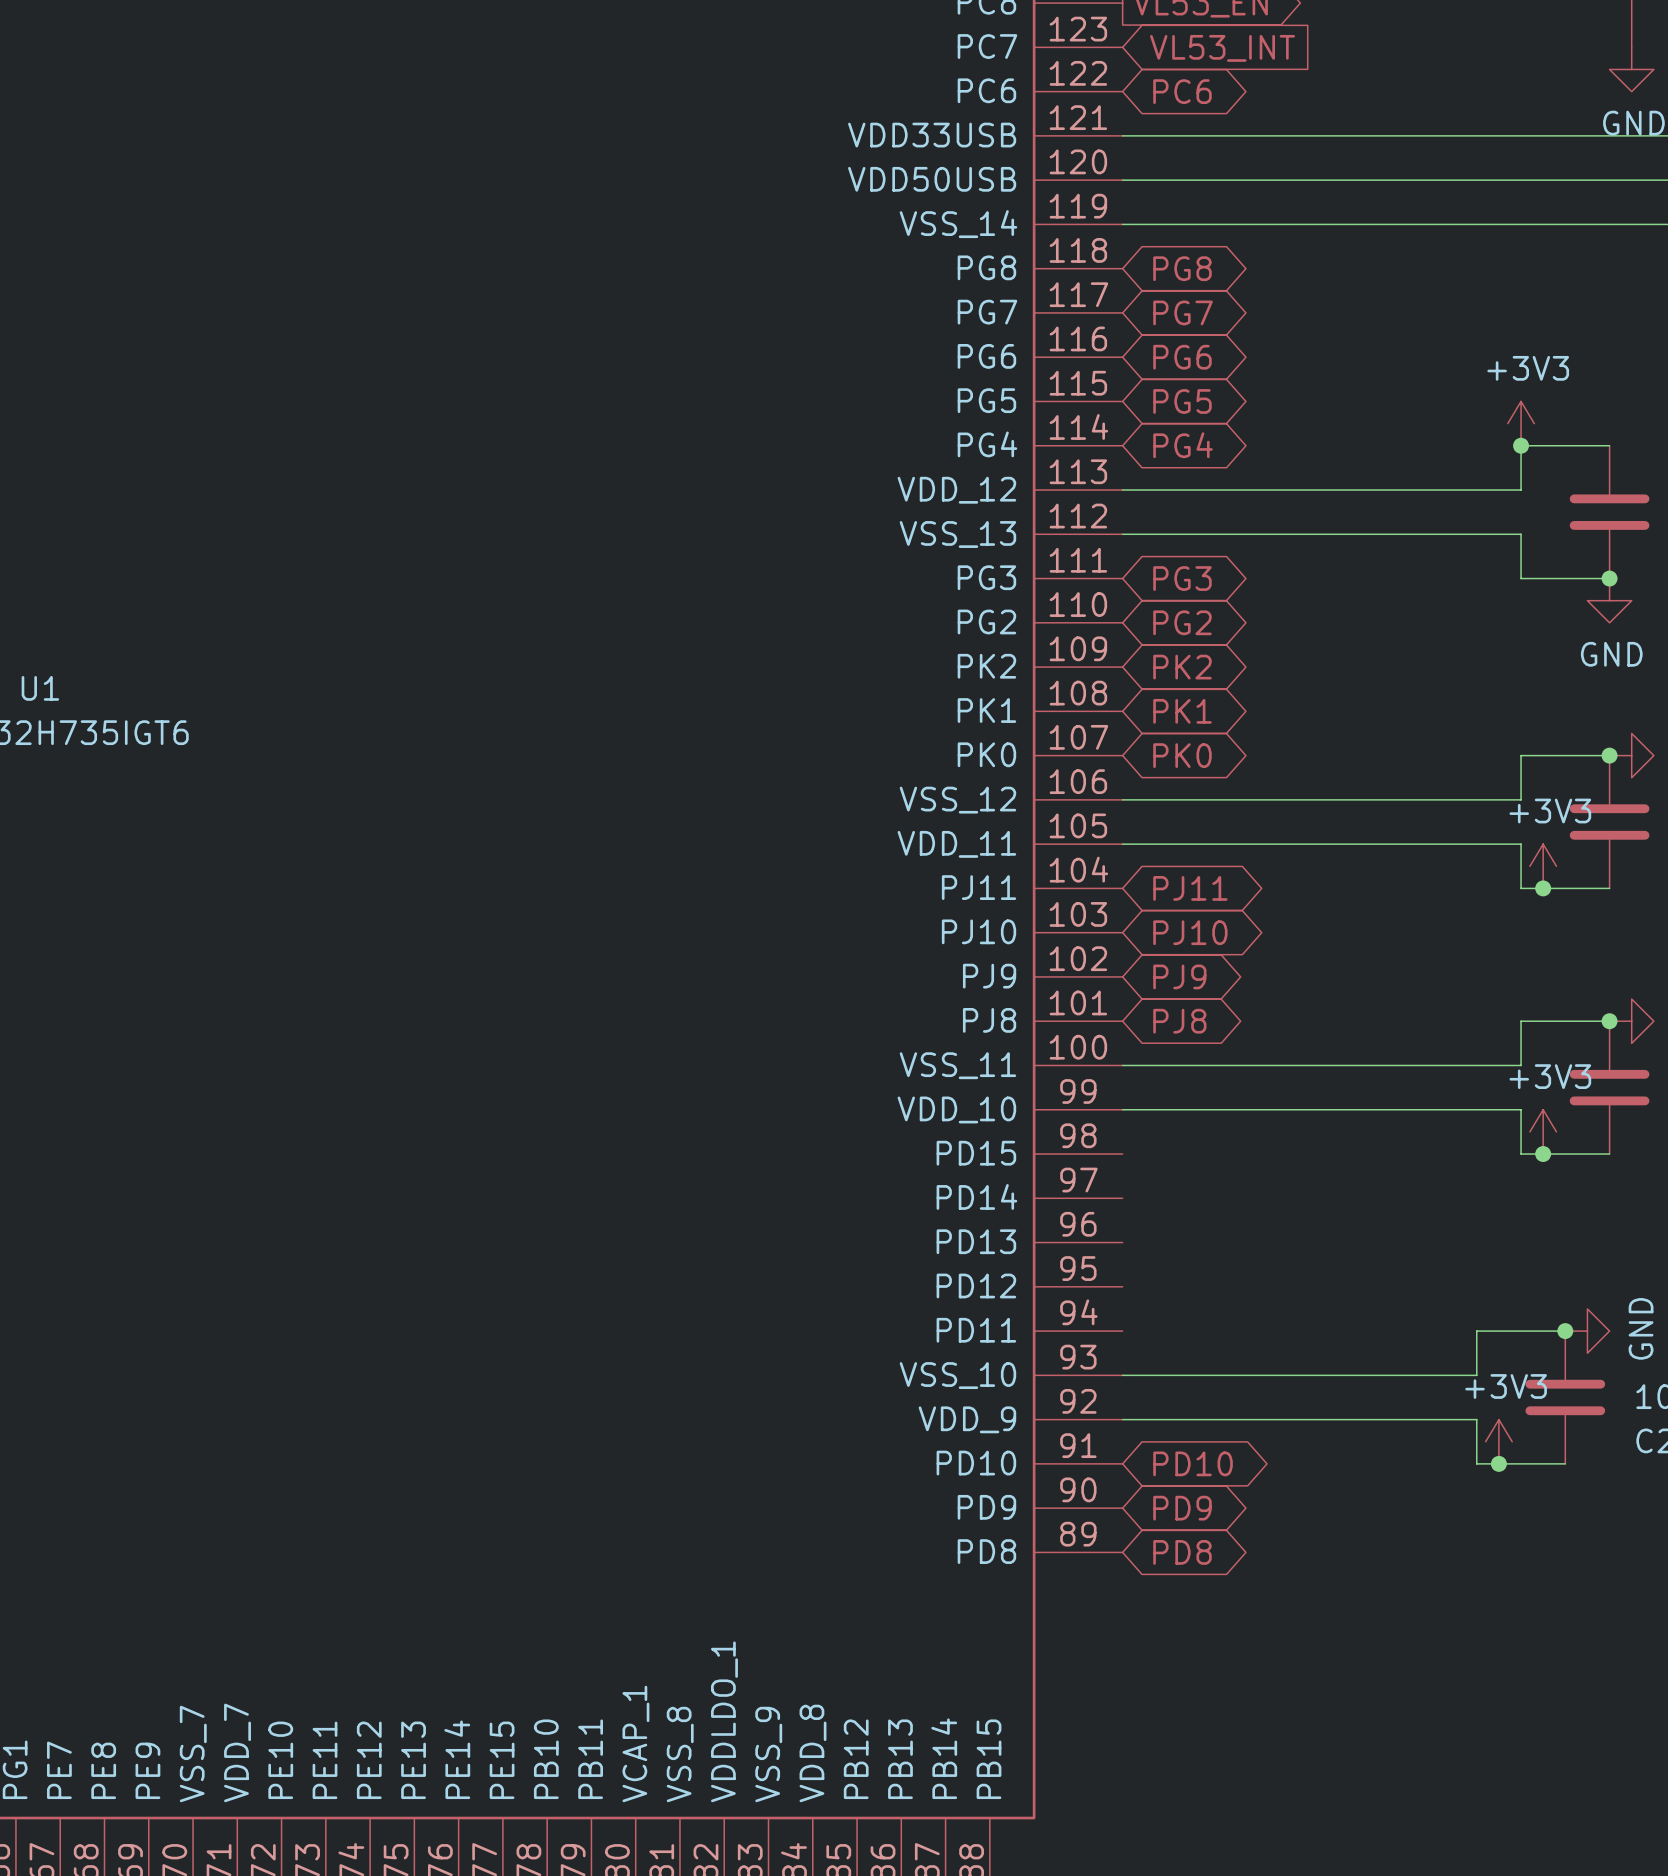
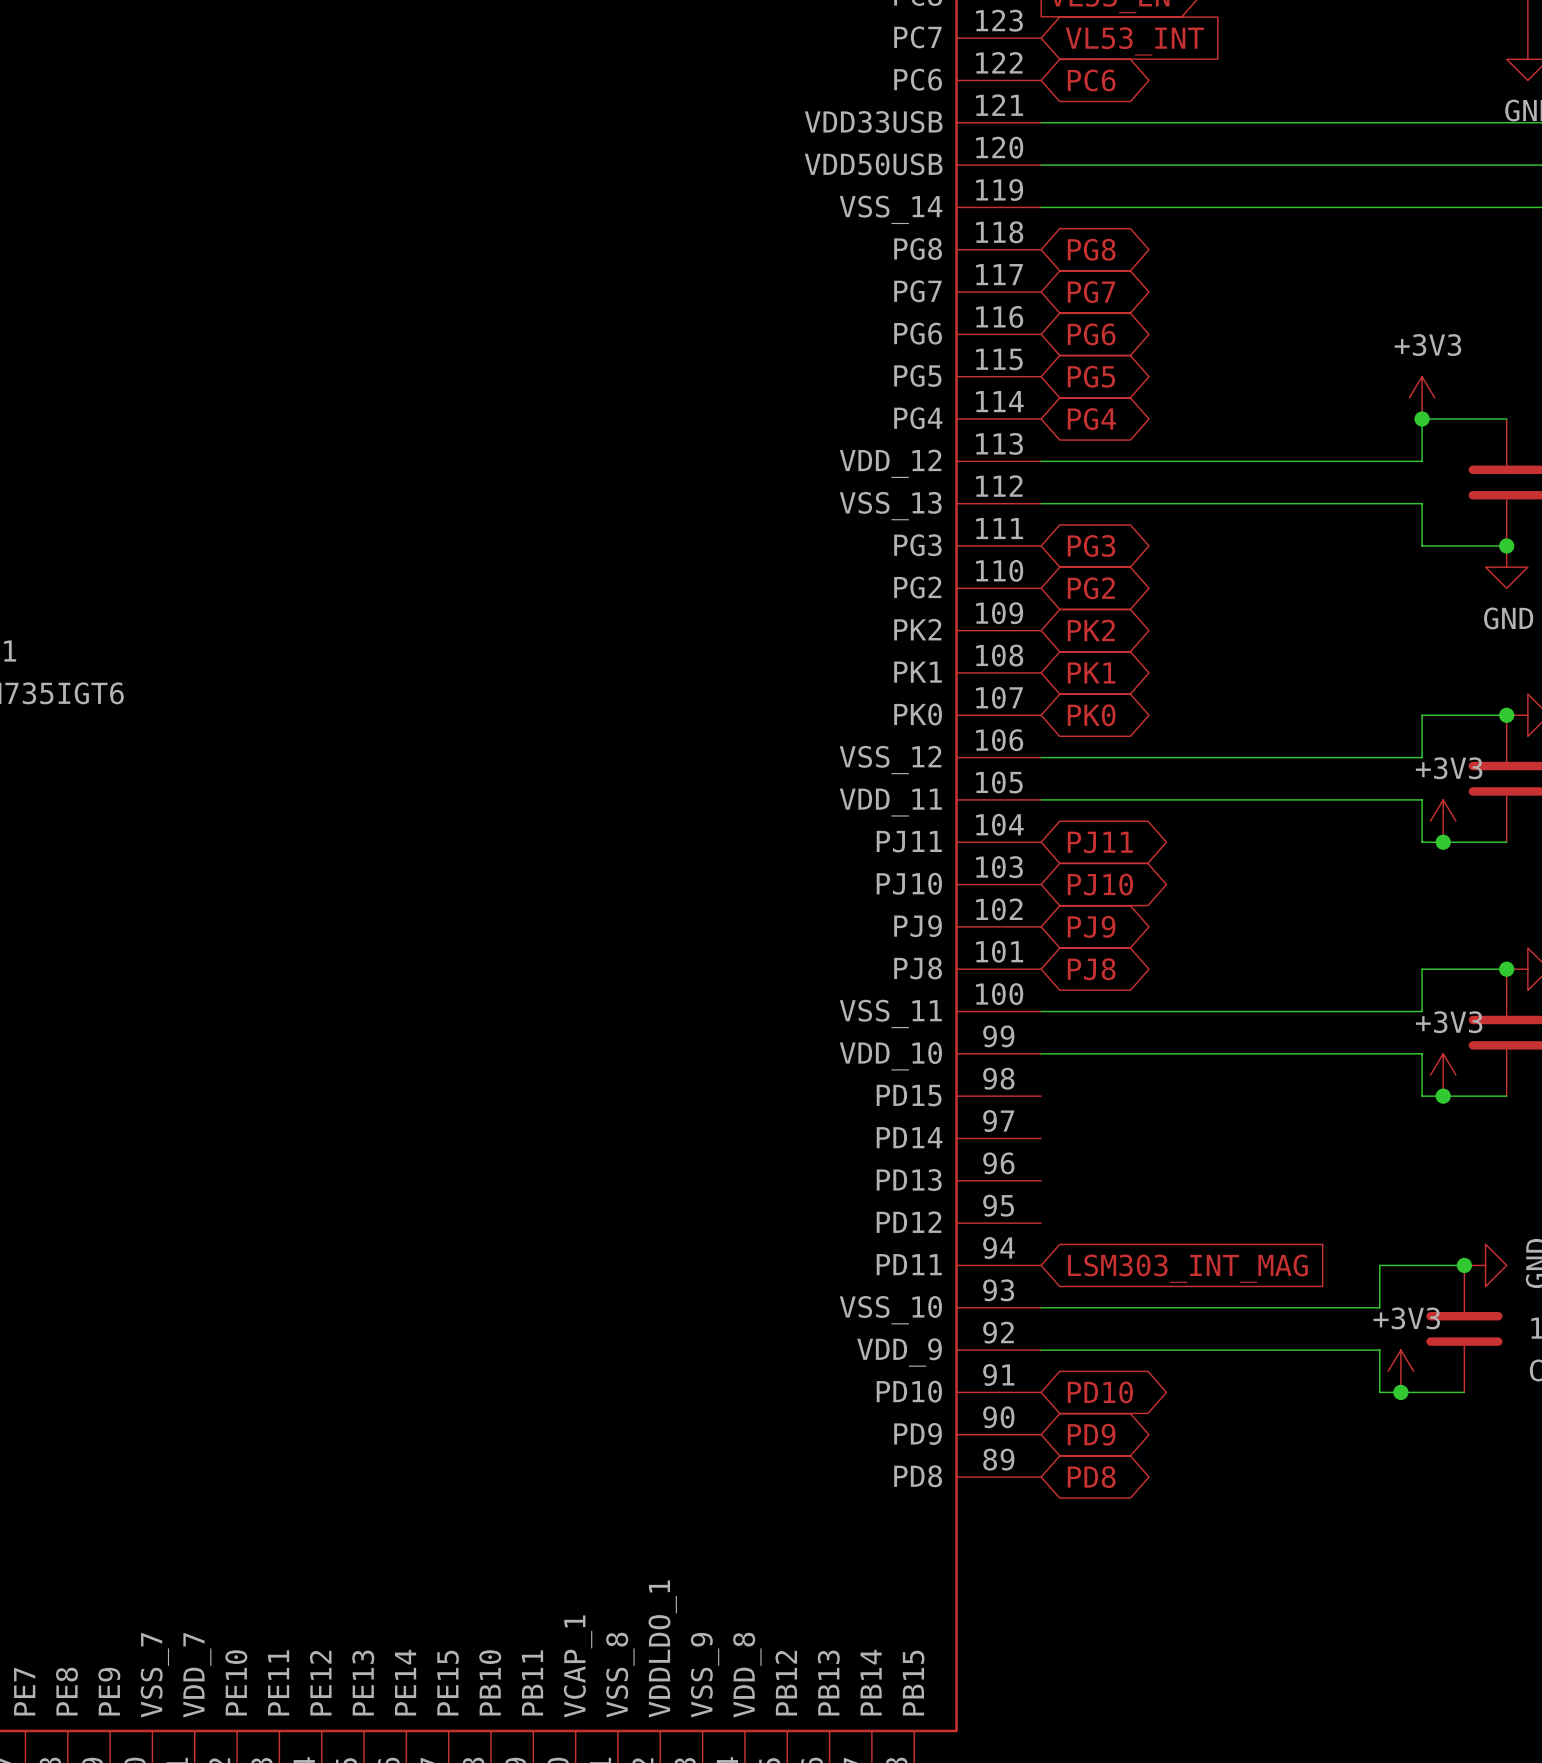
global label: none -> LSM303_INT_MAG (1187, 1268)

